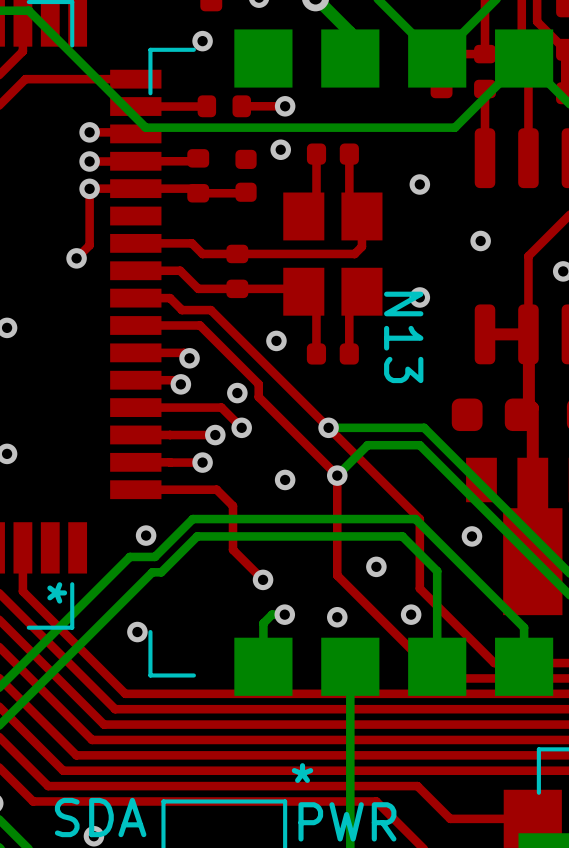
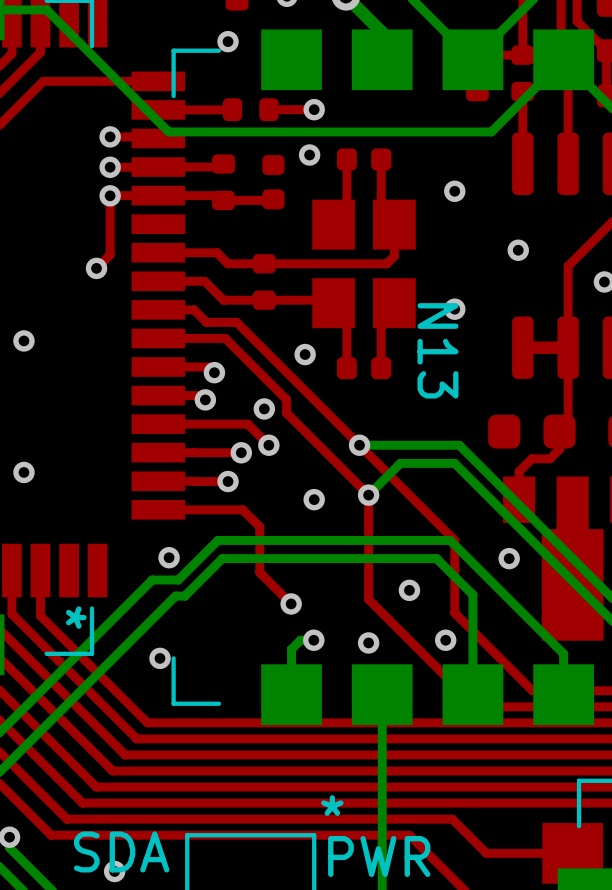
top track: (528, 334) (528, 403) (532, 407) (532, 482) -> (568, 347) (568, 418) (559, 427) (559, 449) (550, 458) (531, 458) (519, 471) (519, 499)

